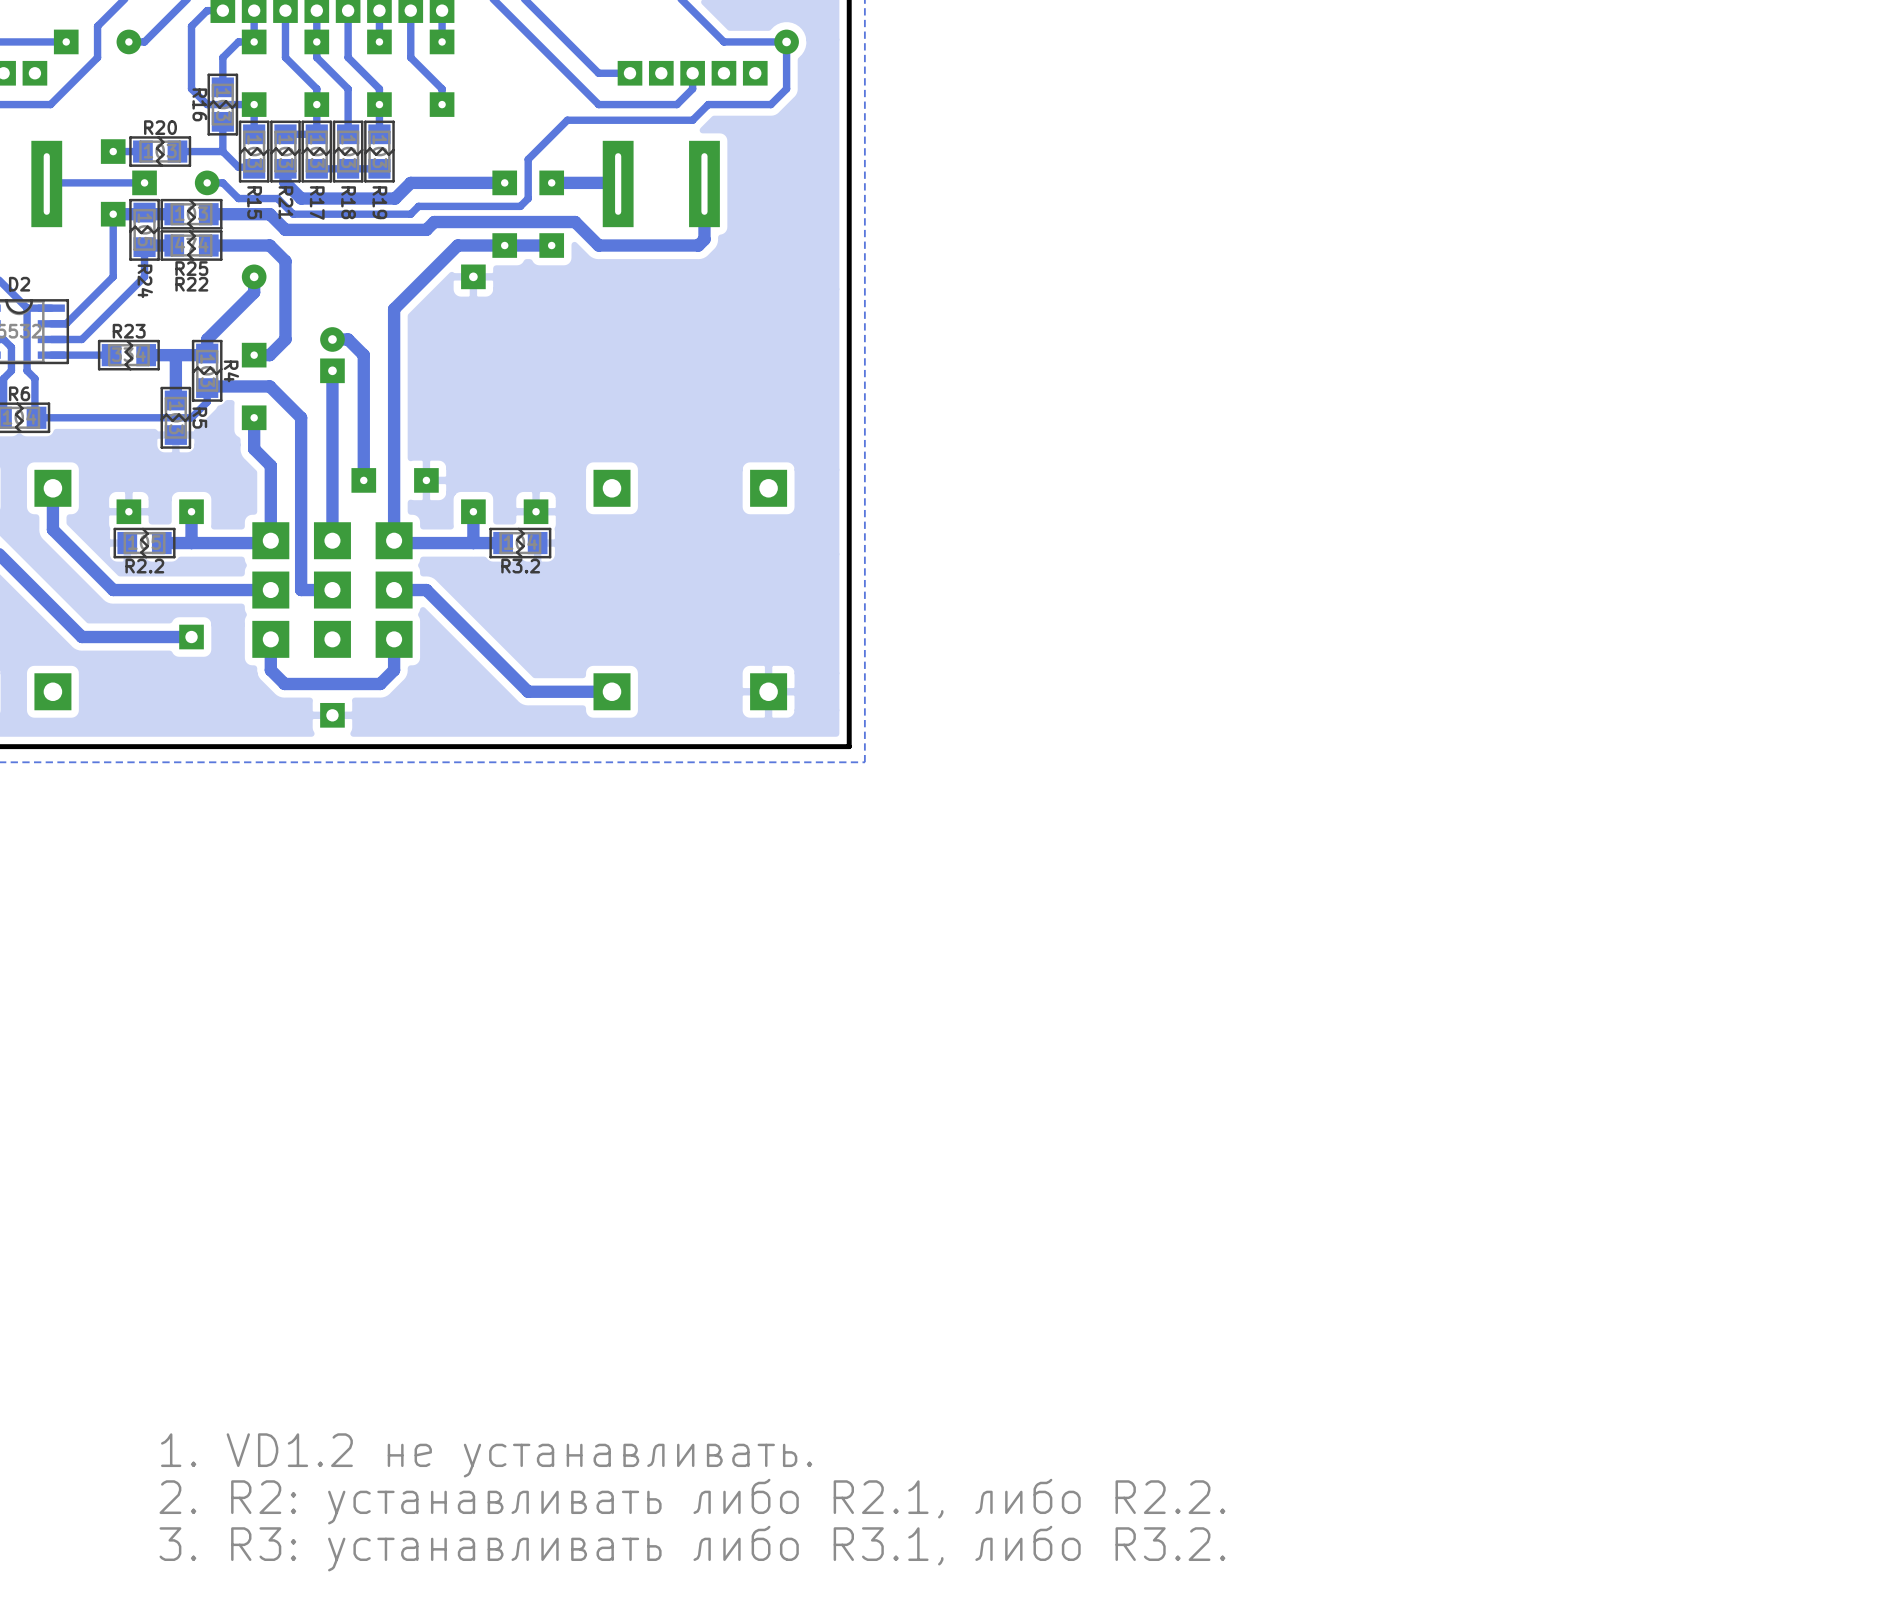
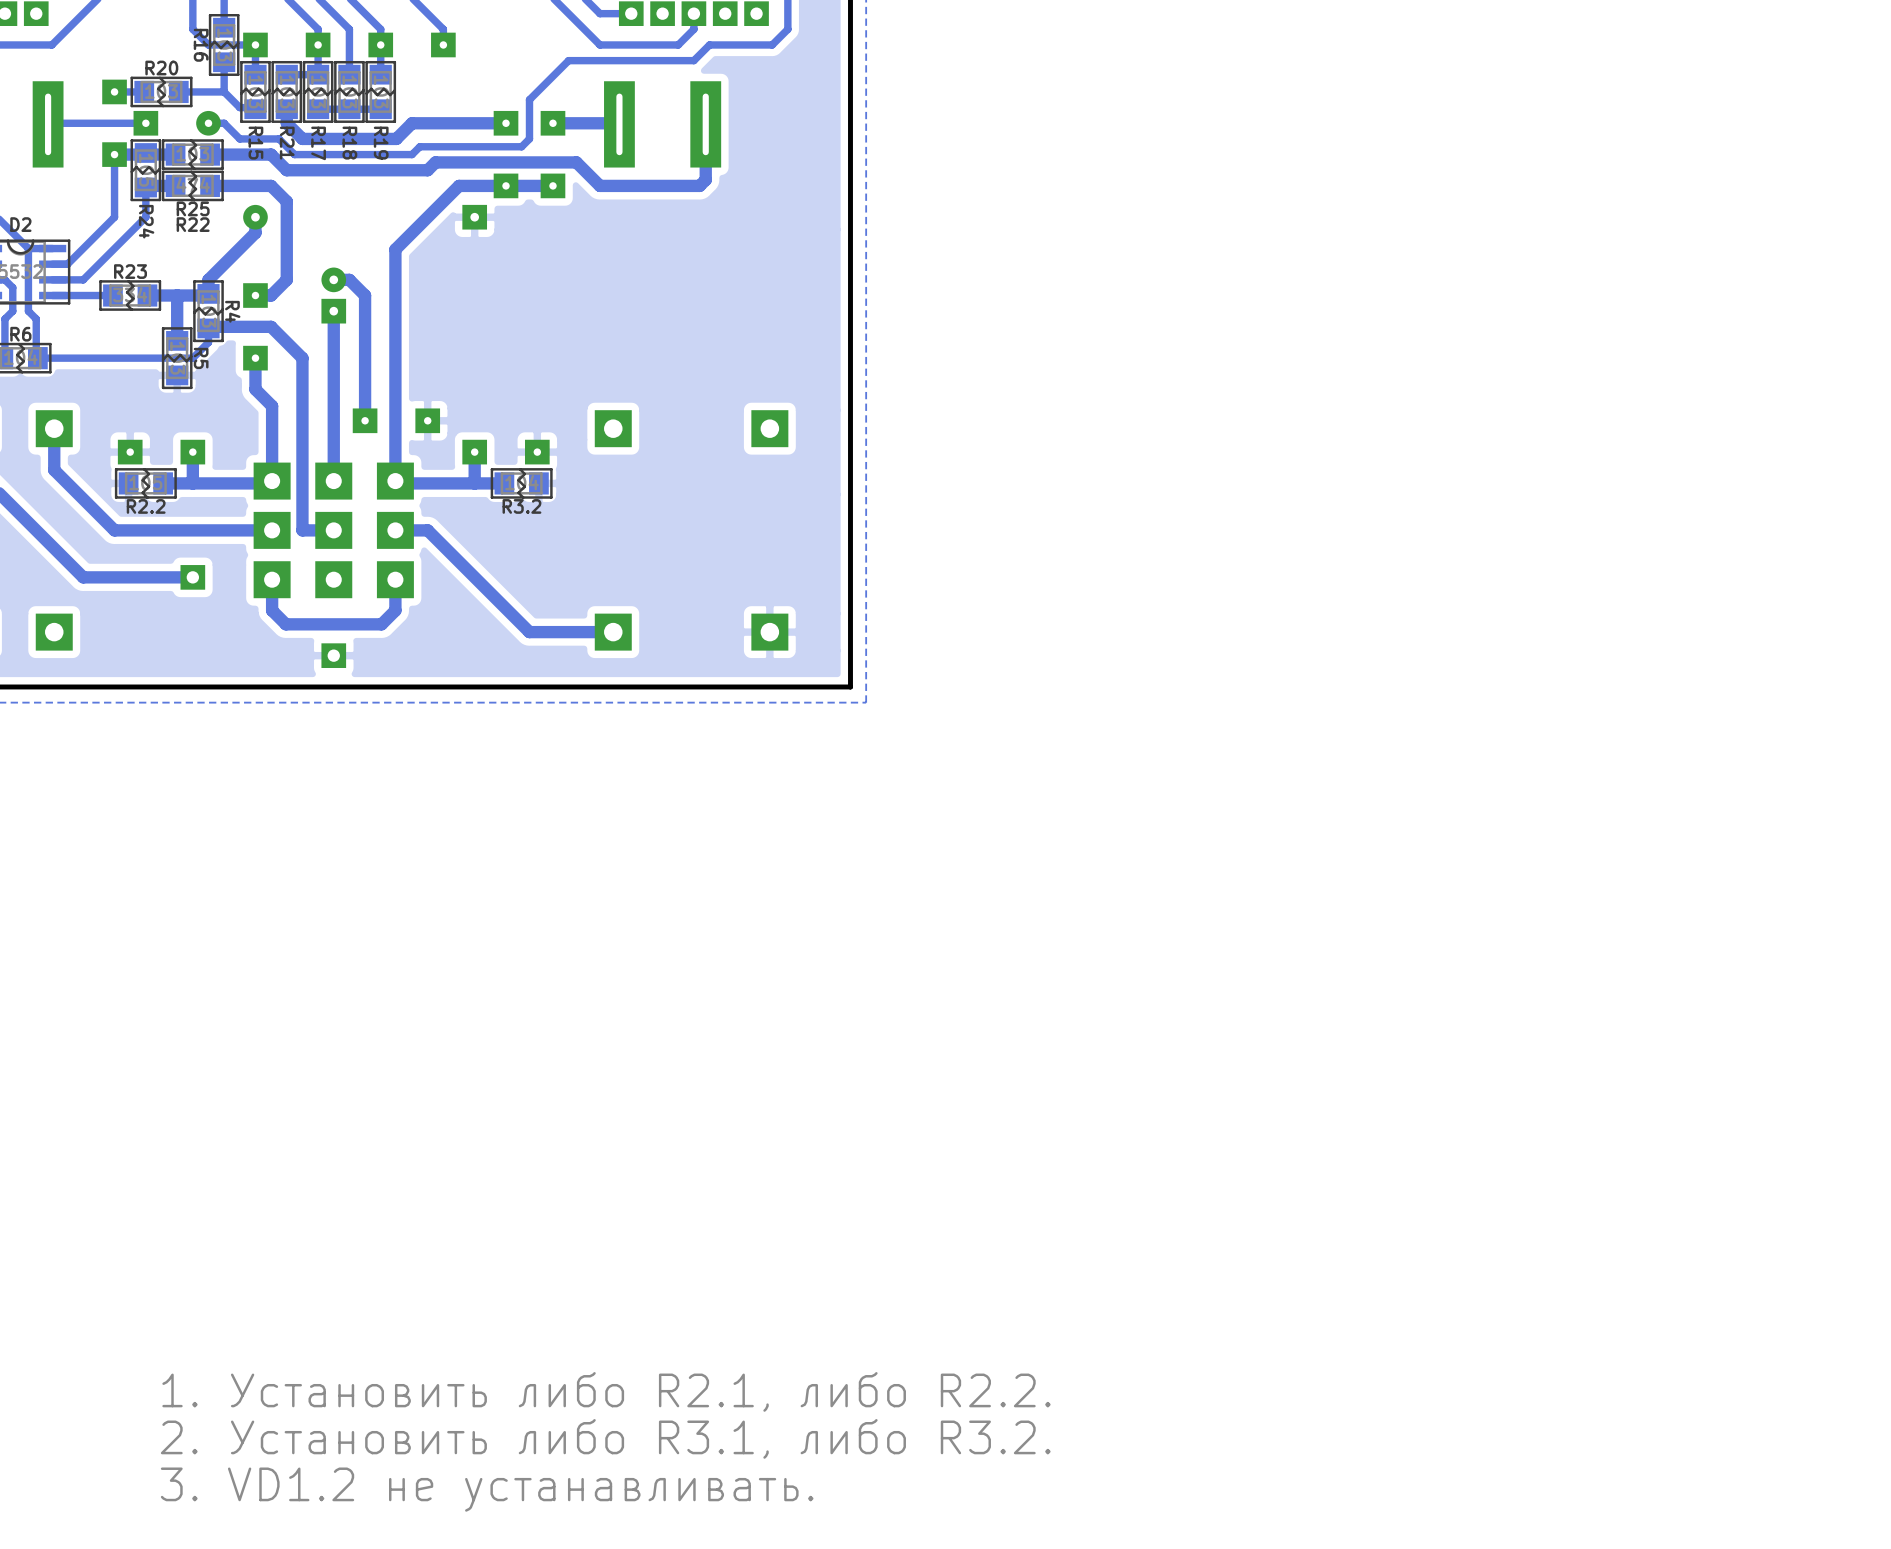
text: 1. VD1.2 не устанавливать. (486, 1455) -> 1. Установить либо R2.1, либо R2.2. (606, 1391)
text: 2. R2: устанавливать либо R2.1, либо R2.2. (692, 1501) -> 2. Установить либо R3.1, либо R3.2. (605, 1438)
text: 3. R3: устанавливать либо R3.1, либо R3.2. (692, 1548) -> 3. VD1.2 не устанавливать. (487, 1489)

